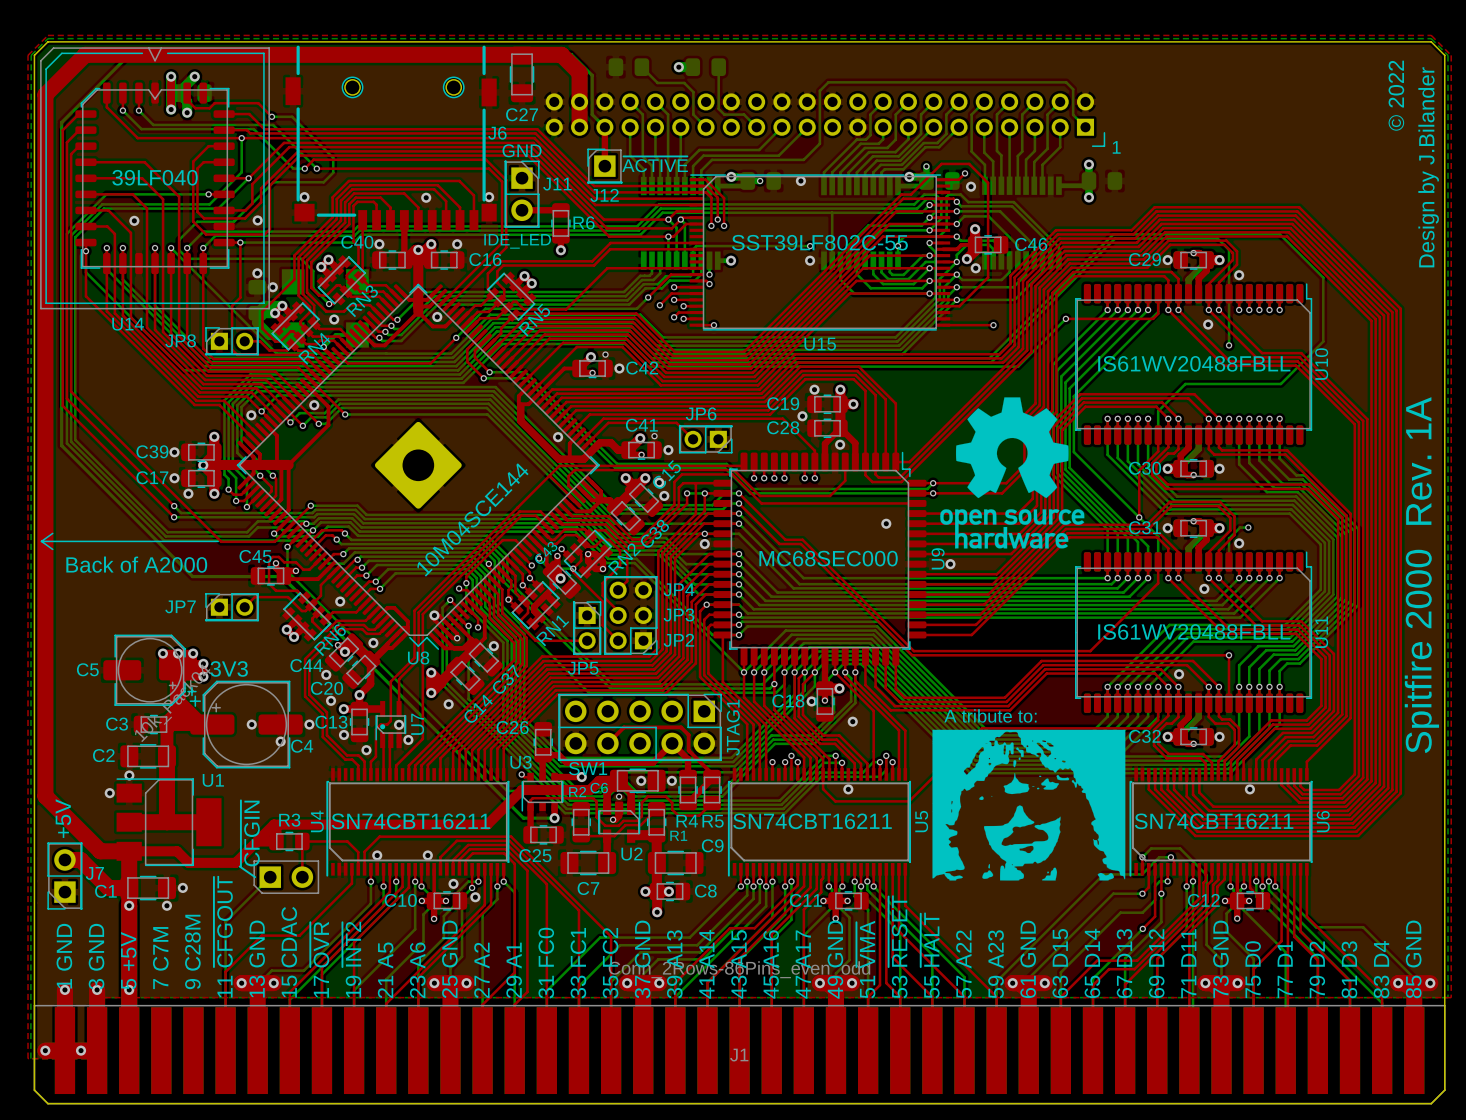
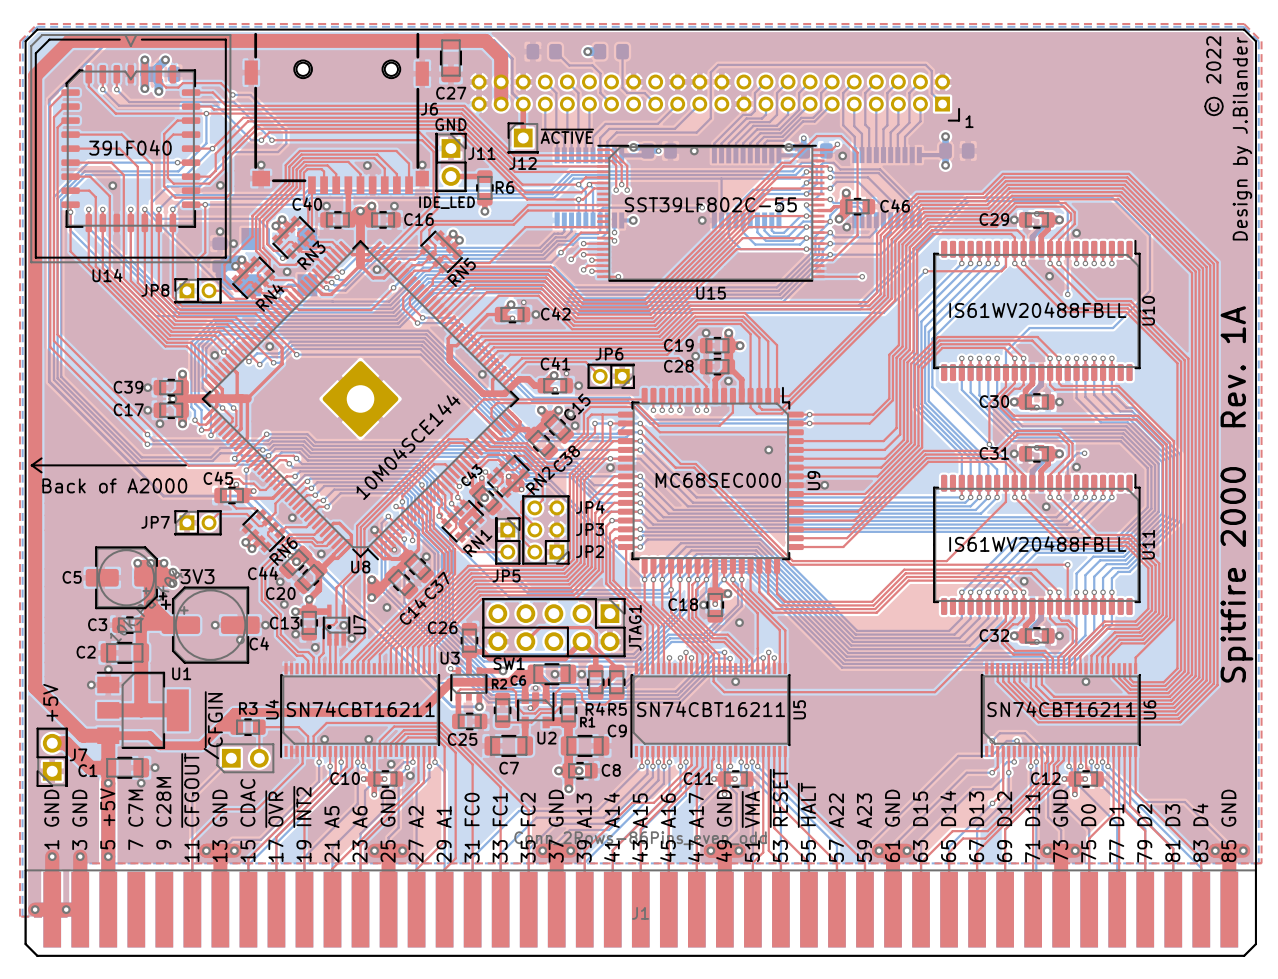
drawing: [940, 397, 1085, 549] -> none
text: A tribute to: (990, 715) -> none
top track: (1149, 728) (982, 728) (909, 801) -> (998, 628) (934, 692) (788, 692)
drawing: [932, 729, 1126, 881] -> none

